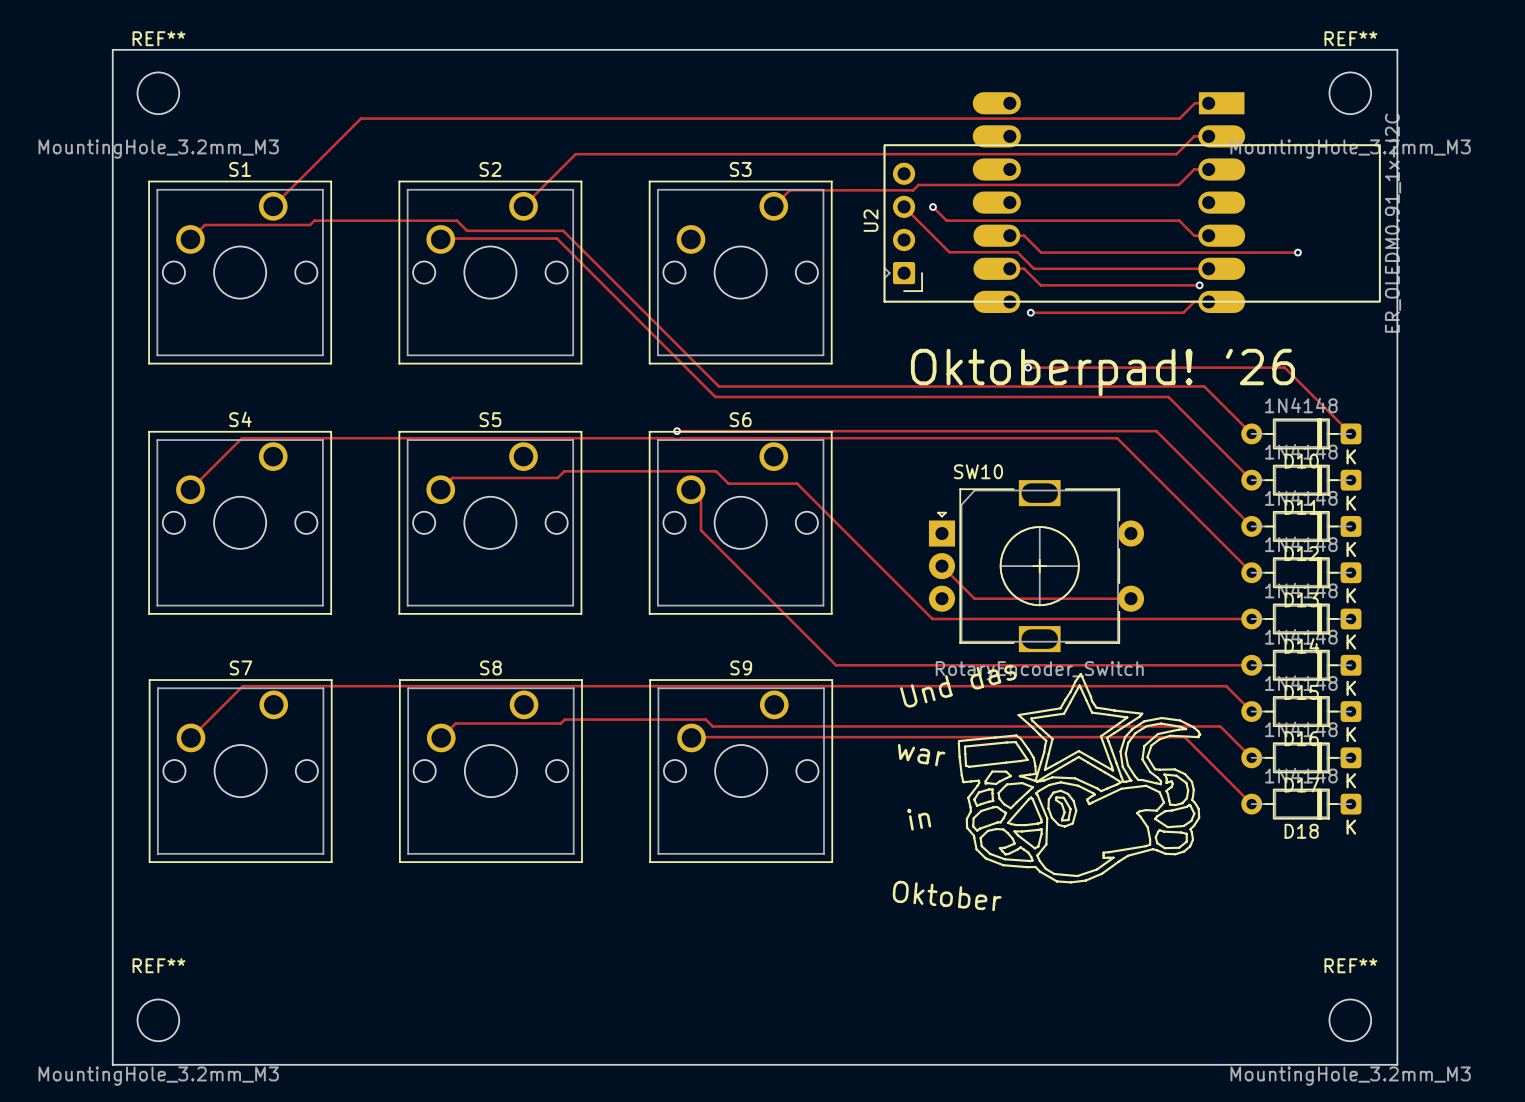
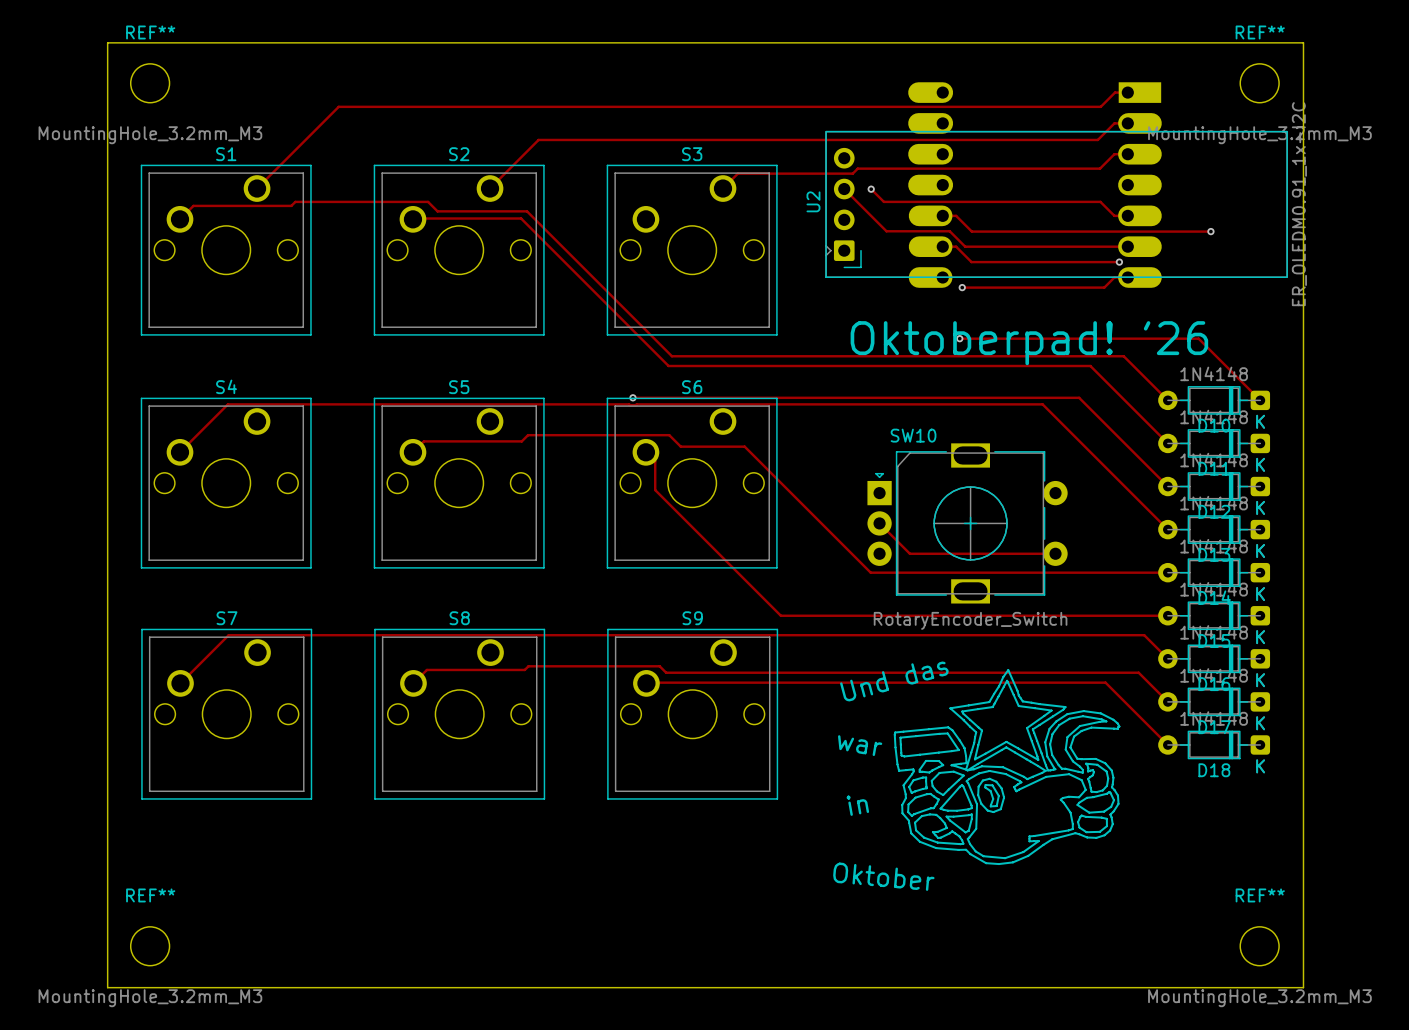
line: (1080, 673) (1060, 708) (1018, 715) (1046, 740) (1035, 780) (1019, 776) (1035, 773) (1035, 766) (1033, 757) (1028, 749) (1016, 735) (959, 741) (958, 743) (963, 782) (978, 780) (979, 782) (968, 797) (970, 811) (966, 819) (967, 827) (974, 835) (976, 849) (985, 858) (1003, 865) (1035, 866) (1056, 881) (1085, 880) (1102, 873) (1128, 855) (1152, 849) (1165, 853) (1175, 854) (1184, 851) (1190, 846) (1193, 839) (1190, 829) (1199, 817) (1198, 808) (1192, 799) (1193, 789) (1191, 781) (1185, 774) (1174, 769) (1154, 769) (1147, 757) (1151, 745) (1159, 739) (1170, 735) (1198, 737) (1200, 734) (1198, 731) (1180, 720) (1161, 718) (1144, 721) (1132, 729) (1125, 737) (1120, 751) (1122, 766) (1131, 780) (1123, 781) (1107, 737) (1142, 713) (1096, 707) (1080, 673) -> (1008, 670) (989, 702) (950, 708) (976, 732) (966, 769) (951, 765) (966, 763) (966, 755) (964, 748) (959, 740) (948, 727) (895, 732) (894, 734) (899, 770) (913, 769) (913, 771) (903, 785) (905, 798) (902, 805) (902, 813) (908, 820) (911, 833) (919, 841) (936, 848) (966, 849) (986, 863) (1012, 862) (1028, 855) (1052, 839) (1075, 833) (1087, 837) (1096, 837) (1104, 835) (1110, 830) (1112, 824) (1110, 814) (1118, 803) (1117, 795) (1111, 787) (1113, 777) (1111, 770) (1105, 763) (1095, 758) (1077, 758) (1070, 747) (1074, 736) (1081, 730) (1091, 727) (1117, 728) (1119, 726) (1117, 723) (1100, 713) (1083, 711) (1067, 714) (1056, 721) (1049, 728) (1045, 742) (1047, 756) (1055, 769) (1047, 770) (1032, 729) (1065, 707) (1022, 701) (1008, 670)
line: (1079, 685) (1064, 713) (1031, 718) (1052, 738) (1044, 769) (1078, 751) (1113, 770) (1100, 736) (1127, 717) (1092, 712) (1079, 685) -> (1007, 680) (992, 707) (962, 711) (982, 730) (974, 759) (1006, 741) (1038, 759) (1027, 728) (1051, 710) (1018, 706) (1007, 680)
text position: Und das (958, 686) -> Und das (894, 681)
line: (1161, 723) (1146, 726) (1135, 733) (1128, 742) (1125, 753) (1127, 765) (1138, 779) (1160, 784) (1161, 781) (1150, 772) (1142, 759) (1144, 746) (1157, 734) (1186, 729) (1161, 723) -> (1082, 716) (1069, 718) (1059, 725) (1052, 734) (1050, 744) (1052, 755) (1061, 768) (1082, 772) (1083, 770) (1072, 761) (1065, 749) (1067, 737) (1079, 726) (1106, 721) (1082, 716)
line: (1015, 742) (964, 746) (966, 765) (1027, 759) (1015, 742) -> (947, 733) (900, 737) (901, 755) (958, 750) (947, 733)
text position: war (921, 755) -> war (860, 745)
line: (1078, 757) (1036, 781) (1052, 777) (1075, 778) (1101, 791) (1120, 782) (1078, 757) -> (1006, 747) (967, 770) (981, 766) (1003, 767) (1027, 779) (1045, 770) (1006, 747)
line: (992, 771) (985, 783) (996, 784) (1010, 776) (1006, 771) (992, 771) -> (925, 760) (919, 772) (929, 772) (943, 765) (938, 760) (925, 760)
line: (1164, 774) (1166, 782) (1171, 781) (1172, 783) (1166, 790) (1170, 804) (1182, 803) (1186, 798) (1188, 790) (1186, 782) (1176, 775) (1164, 774) -> (1086, 763) (1088, 771) (1092, 769) (1093, 772) (1088, 778) (1091, 791) (1102, 790) (1107, 785) (1106, 771) (1097, 764) (1086, 763)
line: (1060, 782) (1049, 784) (1036, 793) (1047, 818) (1046, 844) (1037, 855) (1045, 868) (1054, 873) (1077, 876) (1097, 869) (1113, 857) (1103, 857) (1103, 852) (1150, 844) (1147, 827) (1137, 813) (1145, 810) (1156, 810) (1164, 802) (1159, 792) (1146, 785) (1121, 788) (1089, 804) (1087, 799) (1094, 794) (1093, 793) (1078, 785) (1060, 782) -> (989, 770) (979, 773) (966, 781) (977, 804) (976, 828) (967, 838) (975, 851) (983, 856) (1005, 858) (1023, 852) (1038, 841) (1029, 841) (1029, 836) (1072, 829) (1070, 812) (1060, 799) (1068, 796) (1079, 797) (1085, 789) (1081, 780) (1069, 774) (1046, 776) (1016, 791) (1014, 787) (1021, 782) (1020, 781) (1005, 774) (989, 770)
line: (1022, 783) (1006, 784) (998, 792) (999, 798) (1004, 804) (1010, 808) (1032, 787) (1022, 783) -> (953, 771) (939, 772) (931, 780) (932, 786) (936, 791) (943, 795) (963, 775) (953, 771)
line: (989, 789) (978, 792) (974, 799) (977, 805) (993, 800) (992, 789) (989, 789) -> (922, 777) (913, 780) (909, 786) (911, 792) (926, 788) (926, 777) (922, 777)
line: (1060, 790) (1053, 792) (1048, 799) (1048, 808) (1051, 817) (1058, 824) (1064, 826) (1072, 823) (1076, 810) (1073, 801) (1067, 793) (1060, 790) -> (989, 778) (982, 780) (978, 786) (978, 795) (981, 803) (987, 810) (993, 812) (1000, 809) (1004, 797) (1001, 788) (996, 781) (989, 778)
line: (1031, 797) (1028, 799) (1008, 822) (1025, 825) (1041, 822) (1031, 797) -> (962, 785) (959, 786) (940, 808) (957, 810) (971, 808) (962, 785)
line: (1056, 797) (1055, 800) (1061, 803) (1064, 812) (1061, 820) (1068, 820) (1070, 809) (1063, 797) (1056, 797) -> (985, 784) (985, 787) (990, 791) (993, 799) (990, 806) (996, 806) (998, 795) (992, 785) (985, 784)
line: (1189, 804) (1165, 811) (1155, 818) (1167, 827) (1183, 826) (1191, 820) (1194, 813) (1189, 804) -> (1109, 791) (1086, 797) (1077, 804) (1089, 812) (1104, 811) (1111, 806) (1113, 800) (1109, 791)
line: (997, 806) (981, 810) (973, 818) (973, 826) (977, 830) (1000, 822) (1006, 812) (997, 806) -> (930, 793) (915, 797) (908, 804) (908, 812) (911, 815) (933, 808) (938, 799) (930, 793)
text position: in (919, 819) -> in (857, 805)
line: (996, 829) (987, 830) (980, 837) (981, 846) (990, 853) (1004, 859) (1032, 860) (1028, 852) (1020, 847) (1005, 854) (999, 848) (1014, 843) (1003, 829) (996, 829) -> none
line: (1041, 829) (1022, 831) (1014, 831) (1034, 848) (1038, 846) (1041, 829) -> (971, 814) (953, 816) (946, 816) (965, 832) (968, 830) (971, 814)
line: (1159, 830) (1155, 837) (1157, 843) (1164, 848) (1179, 847) (1186, 841) (1186, 833) (1159, 830) -> (1081, 815) (1078, 822) (1079, 827) (1086, 832) (1099, 831) (1106, 826) (1106, 818) (1081, 815)
line: none -> (929, 814) (921, 816) (915, 822) (916, 830) (923, 837) (937, 842) (963, 843) (959, 836) (952, 831) (938, 838) (932, 832) (946, 827) (936, 814) (929, 814)
text position: Oktober (947, 895) -> Oktober (883, 876)

